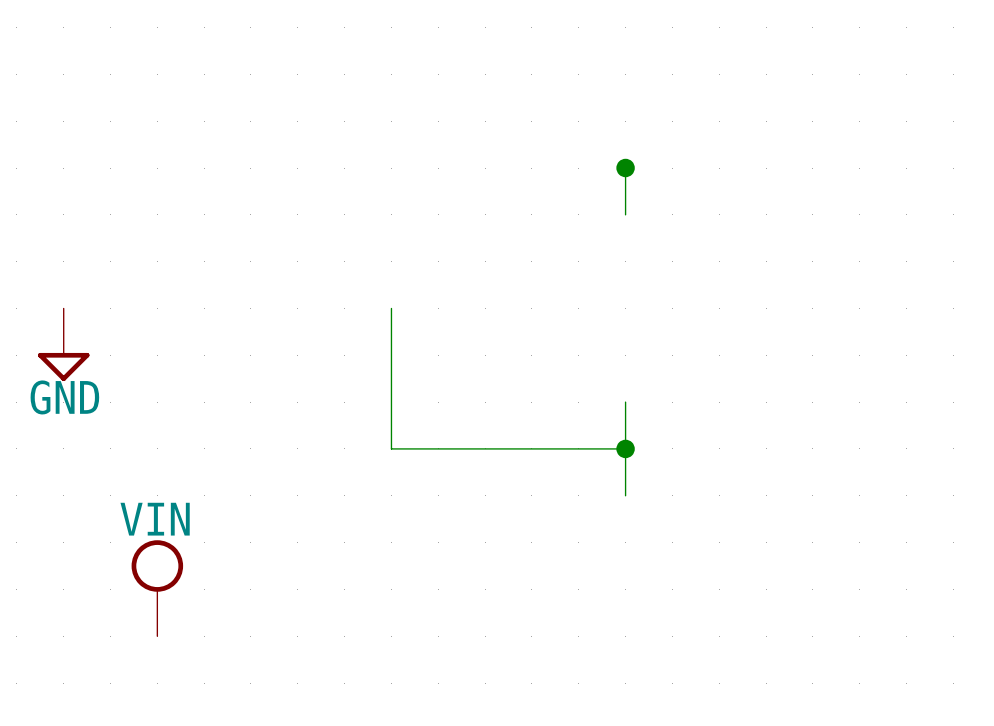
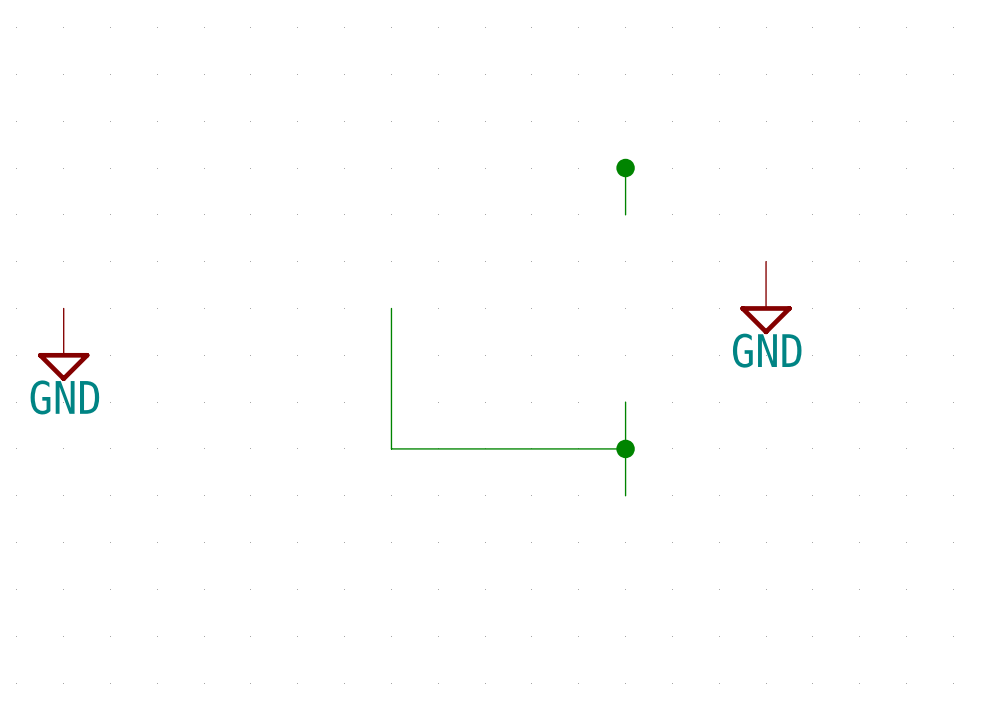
power symbol: none -> GND (766, 297)
power symbol: VIN (157, 588) -> none

